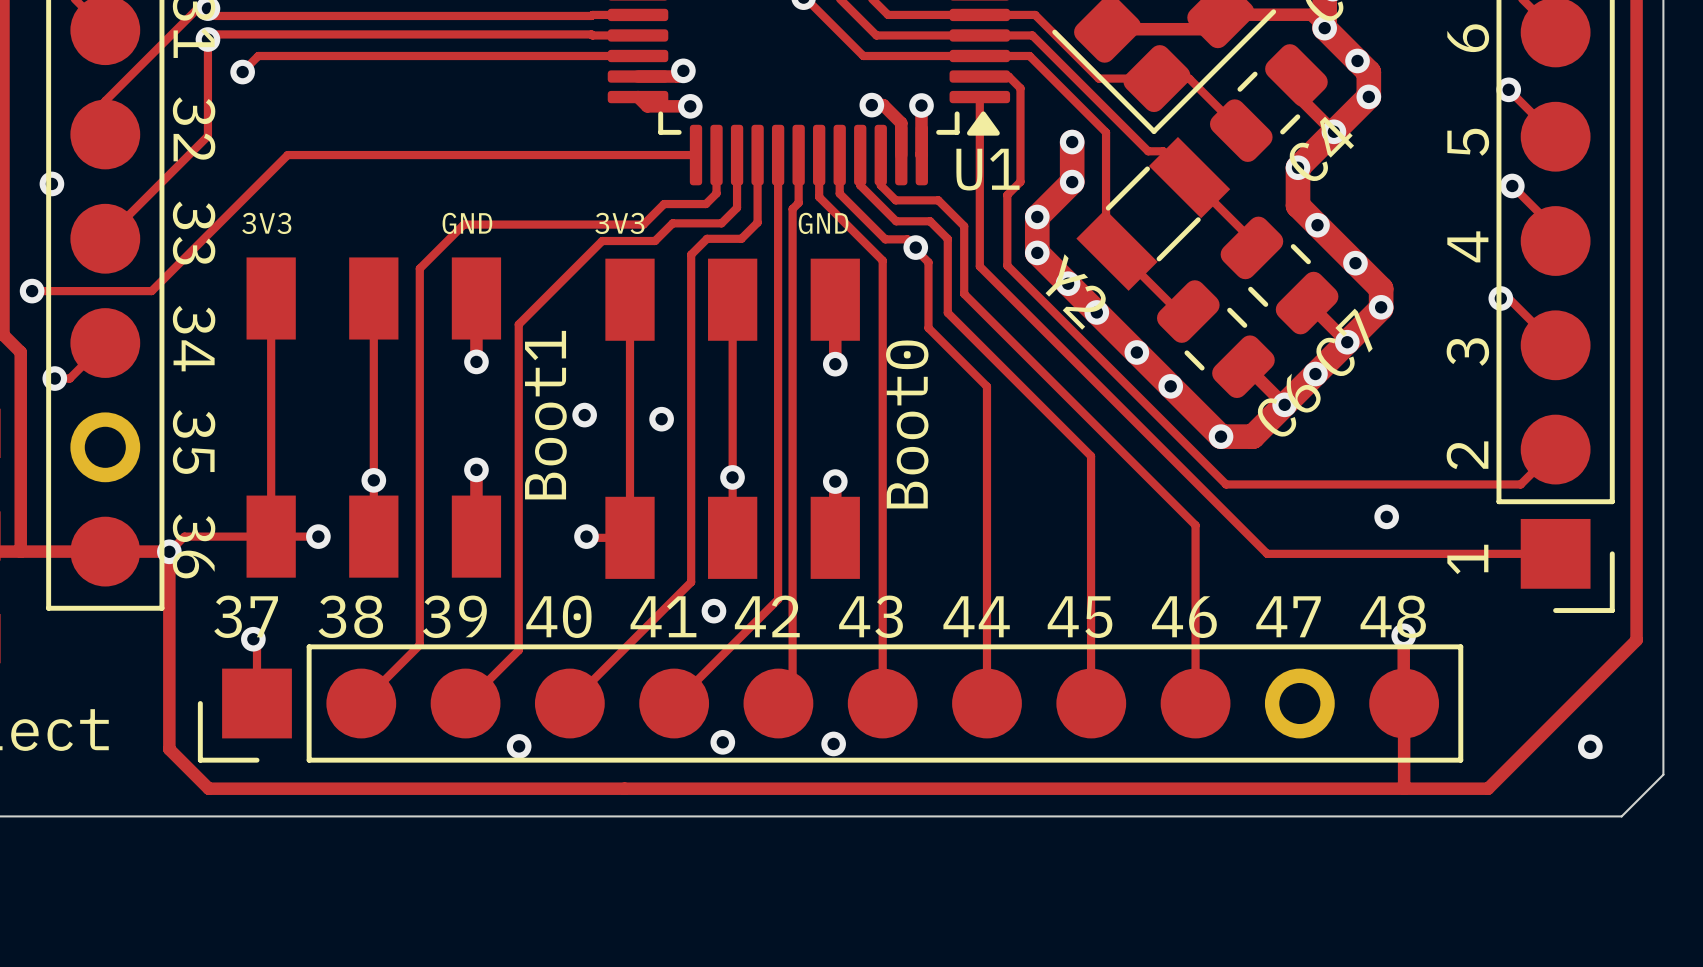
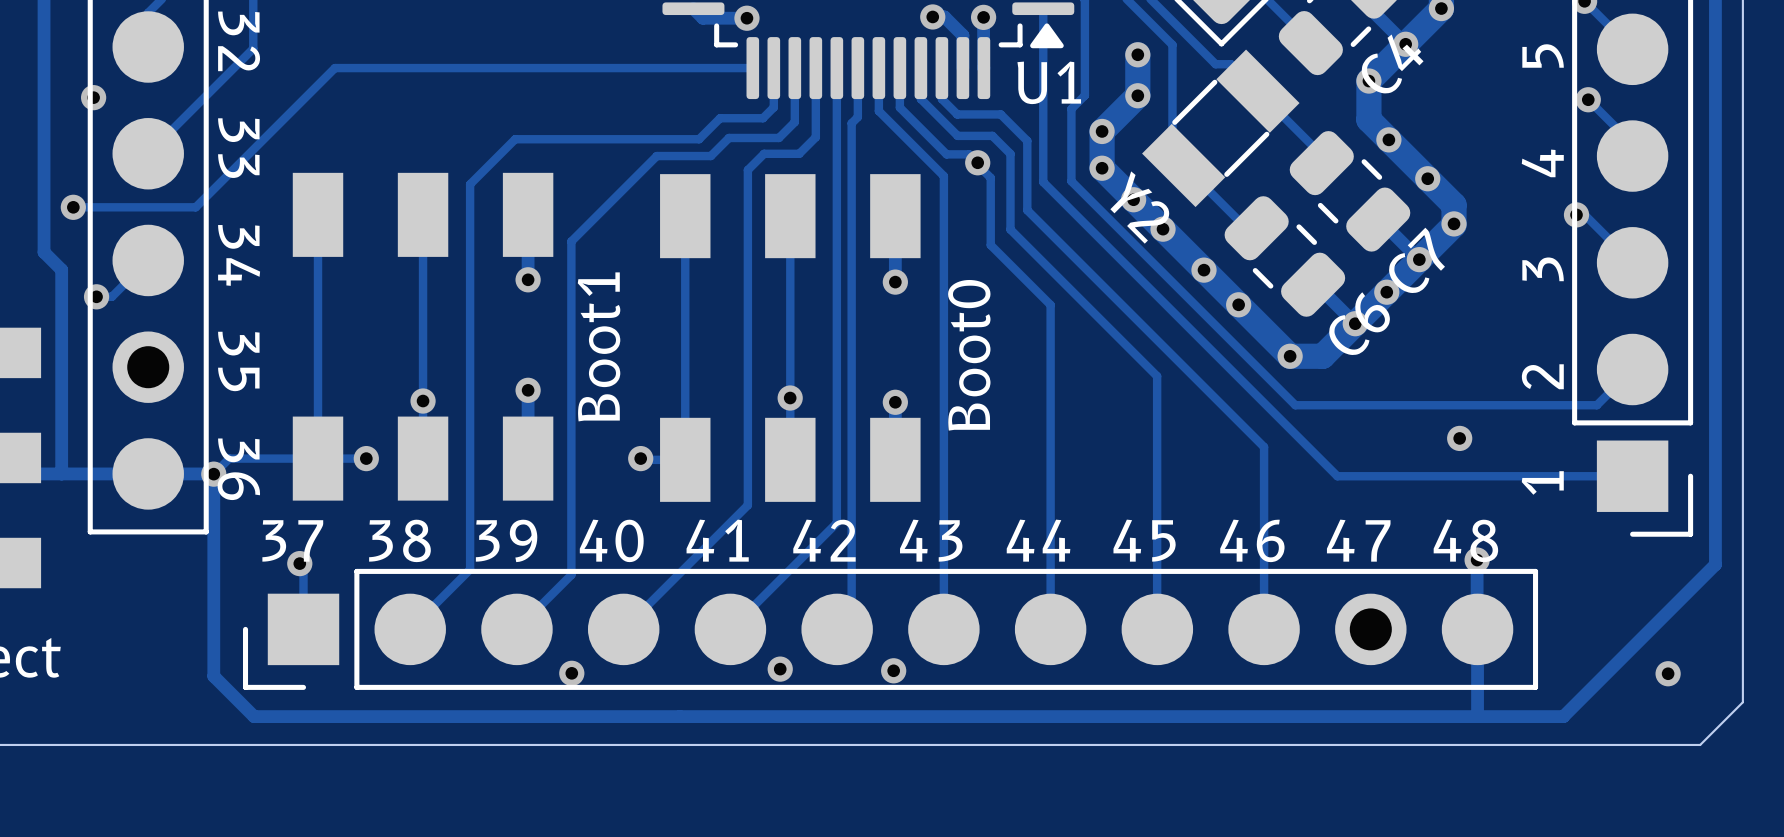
text: 3V3 (266, 223) -> none
text: GND (467, 223) -> none
text: 3V3 (619, 223) -> none
text: GND (823, 223) -> none
via: (584, 415) -> none
via: (661, 419) -> none
via: (713, 611) -> none

